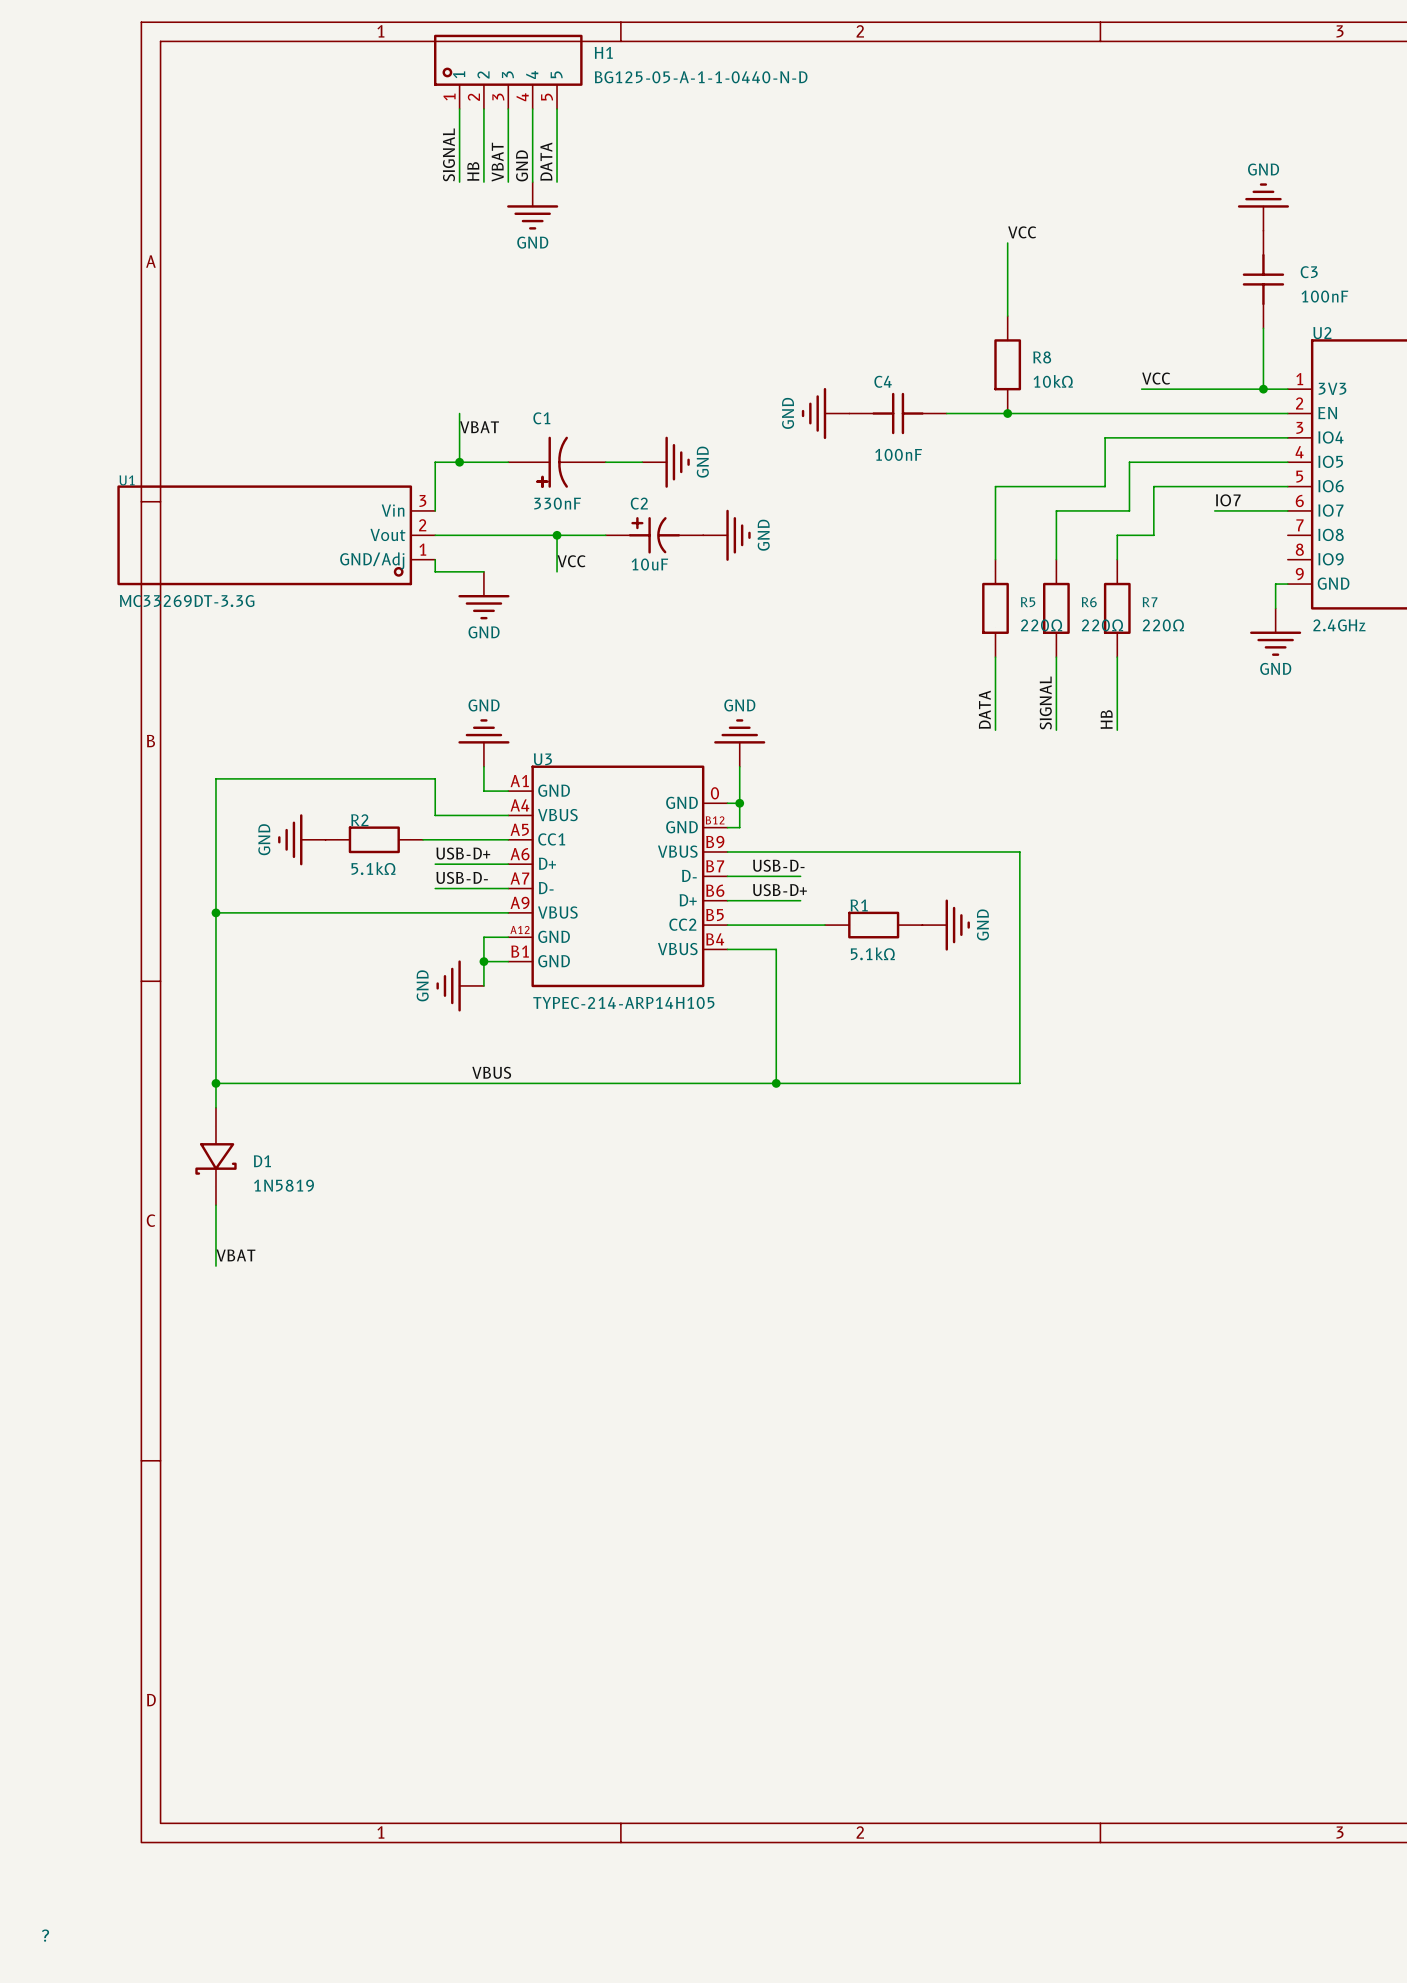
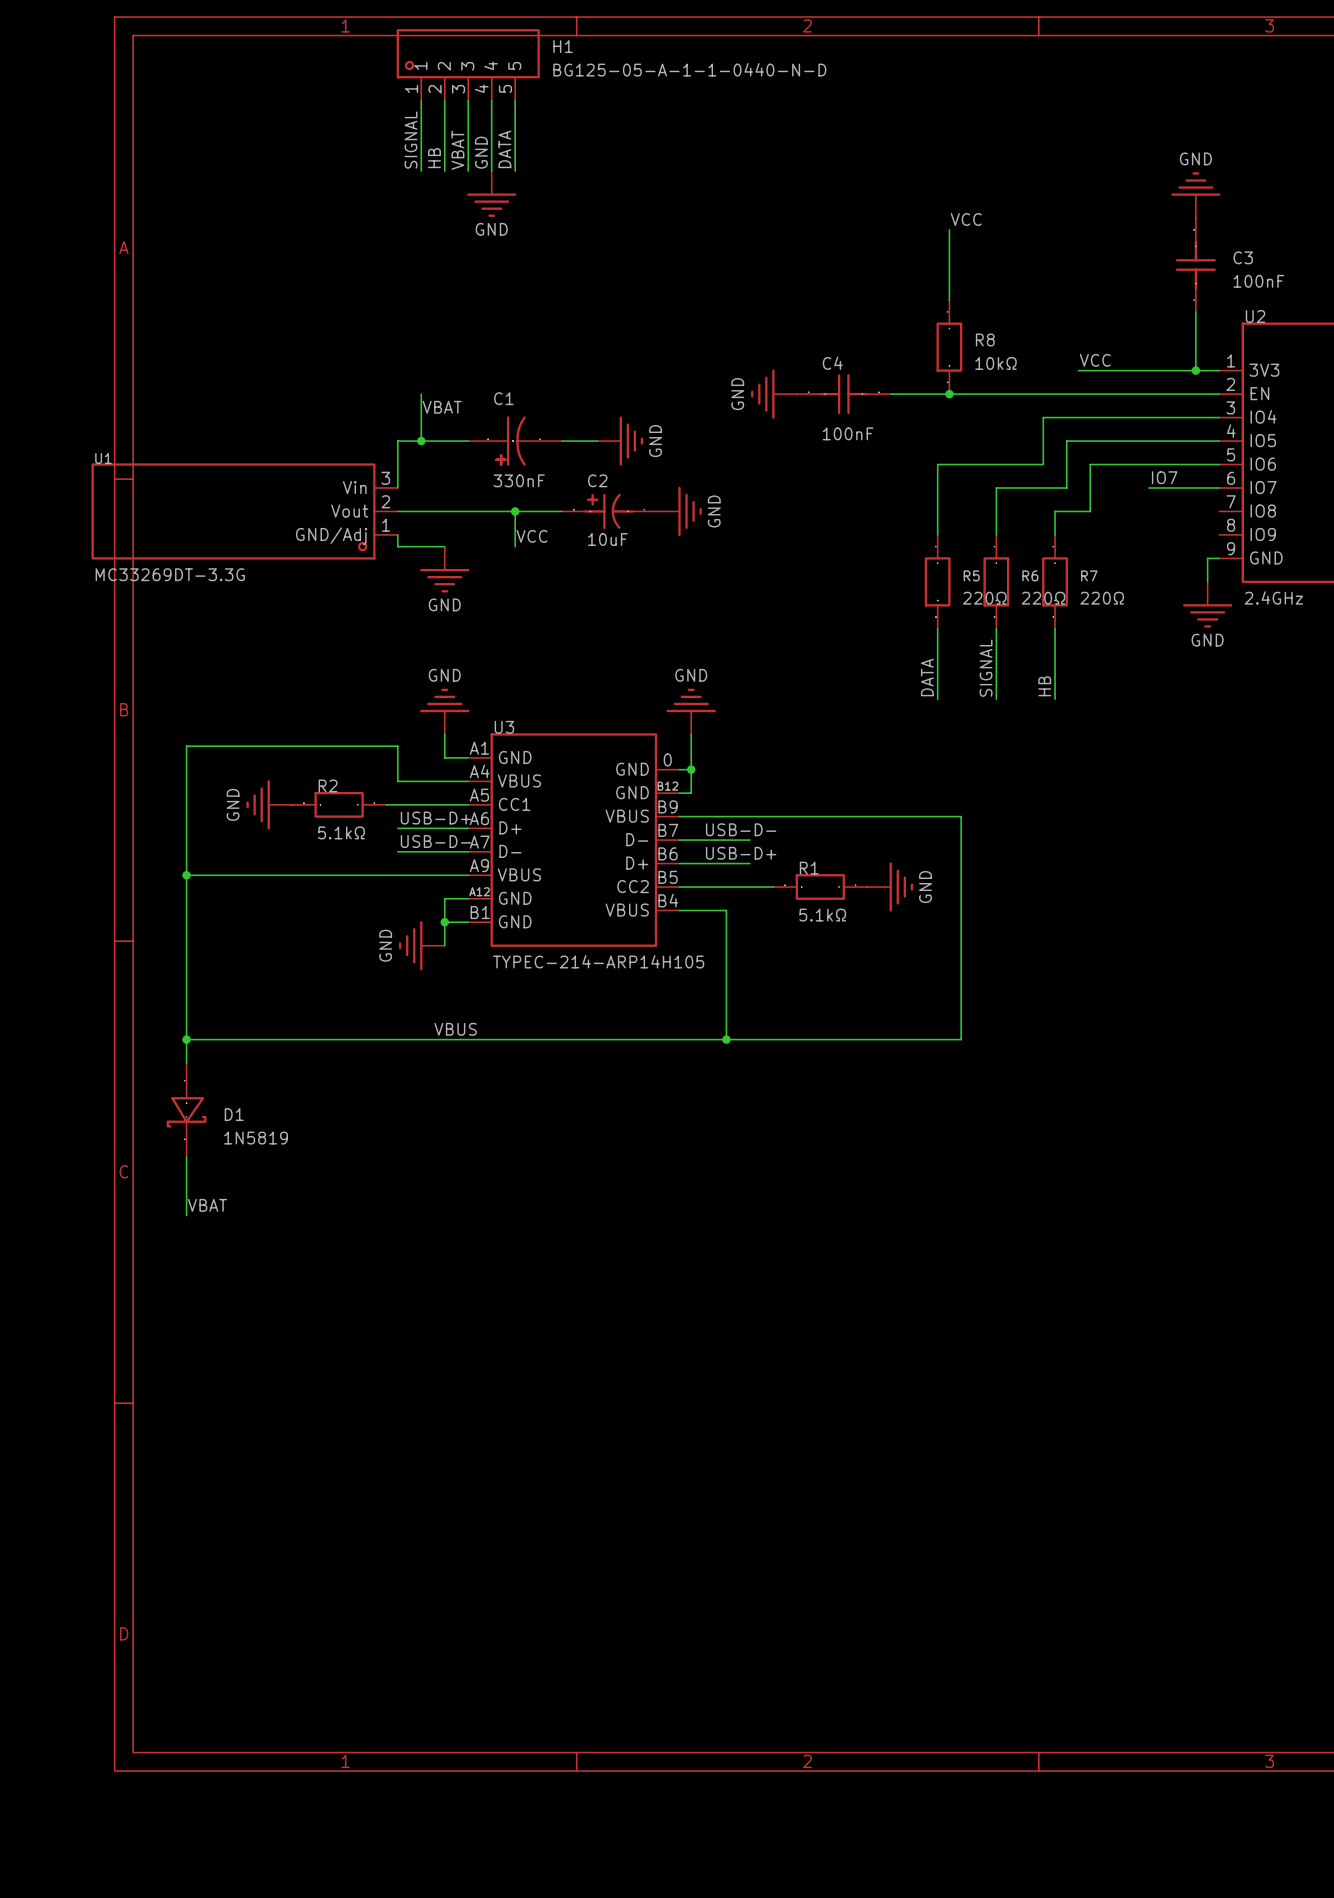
part: (45, 1935) -> none

